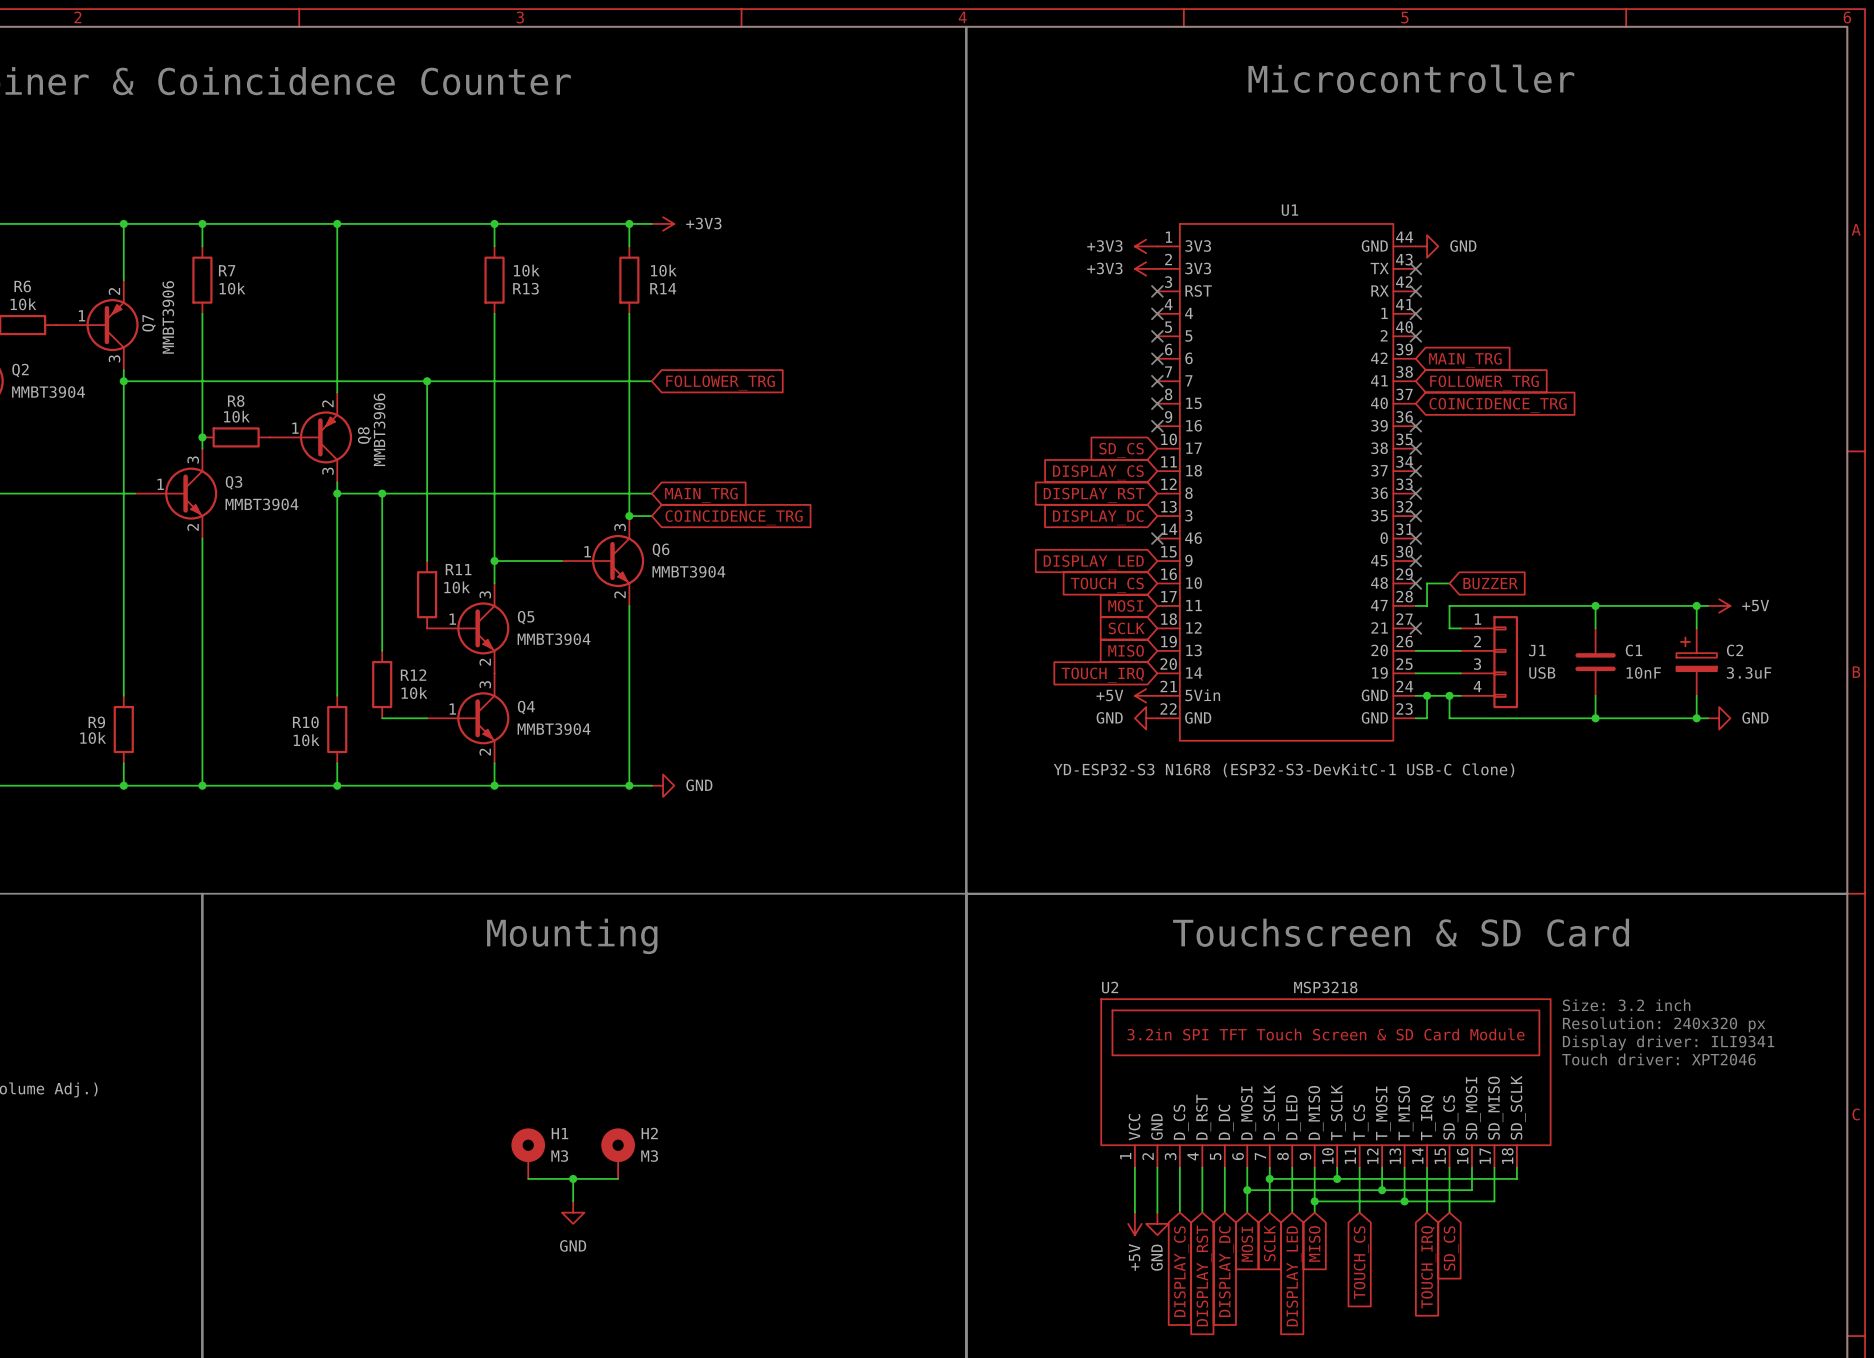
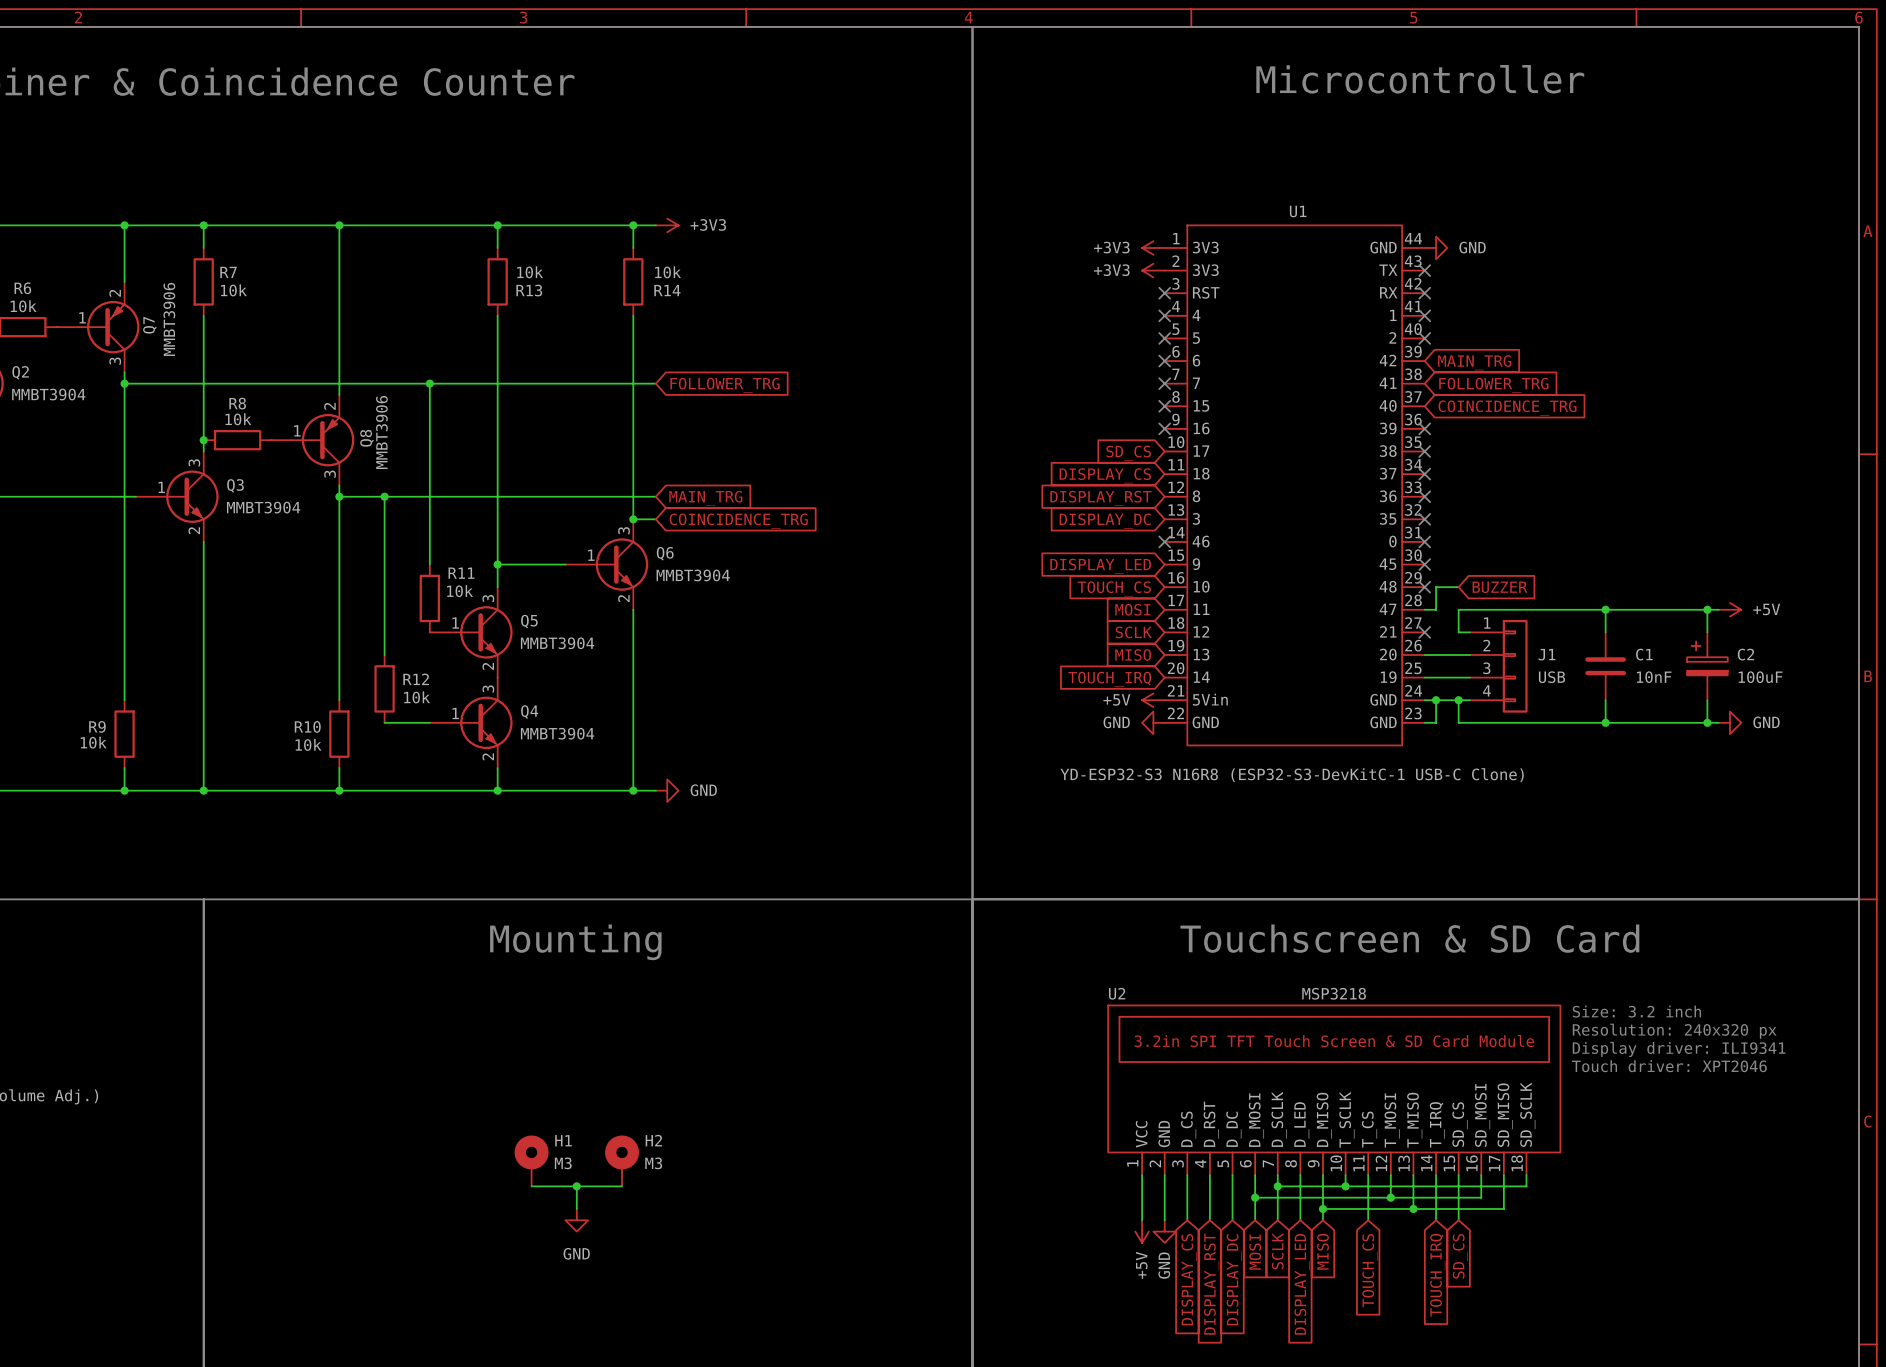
C2 value: 3.3uF (1749, 672) -> 100uF (1760, 677)

